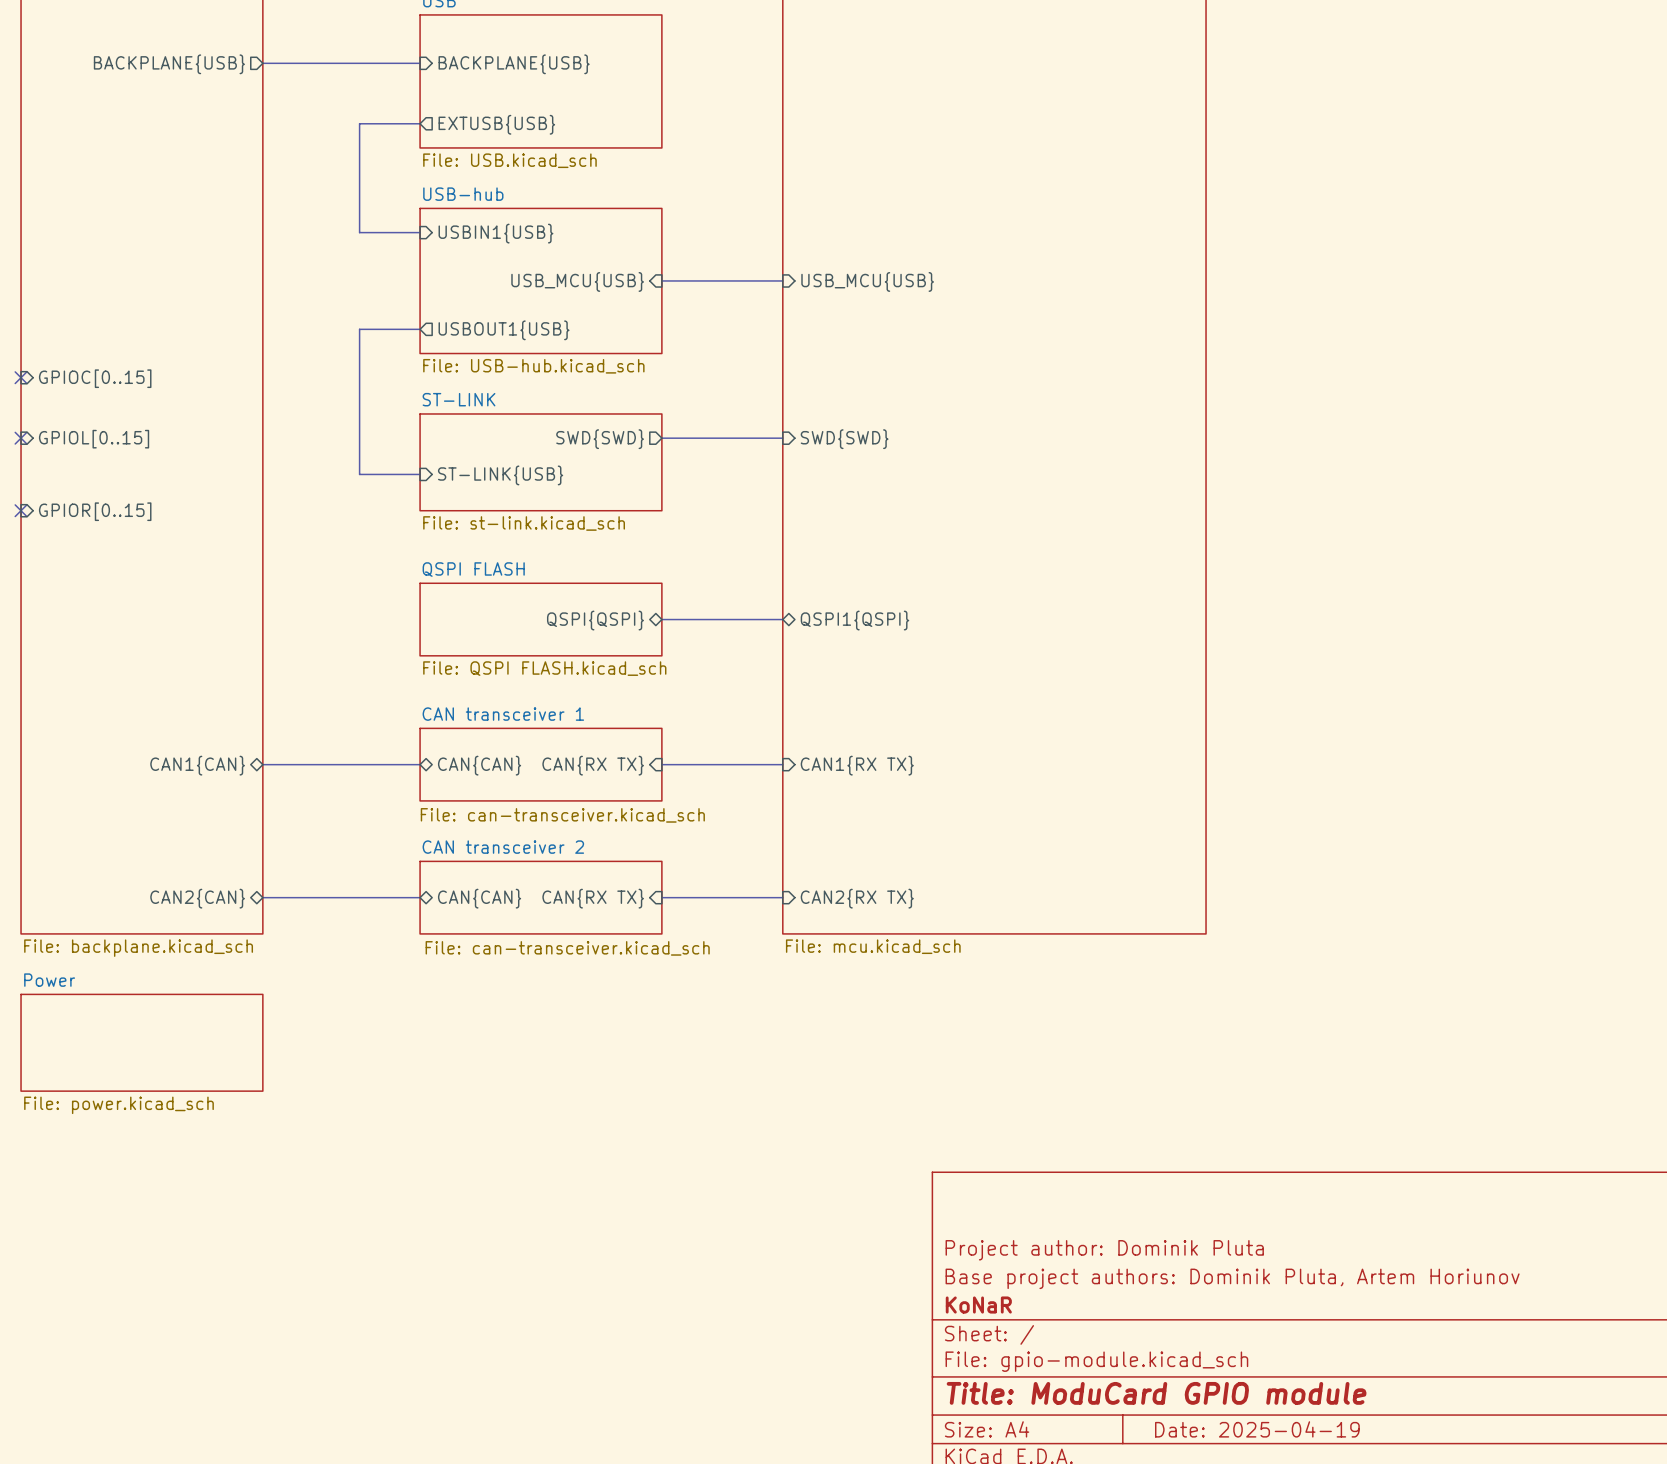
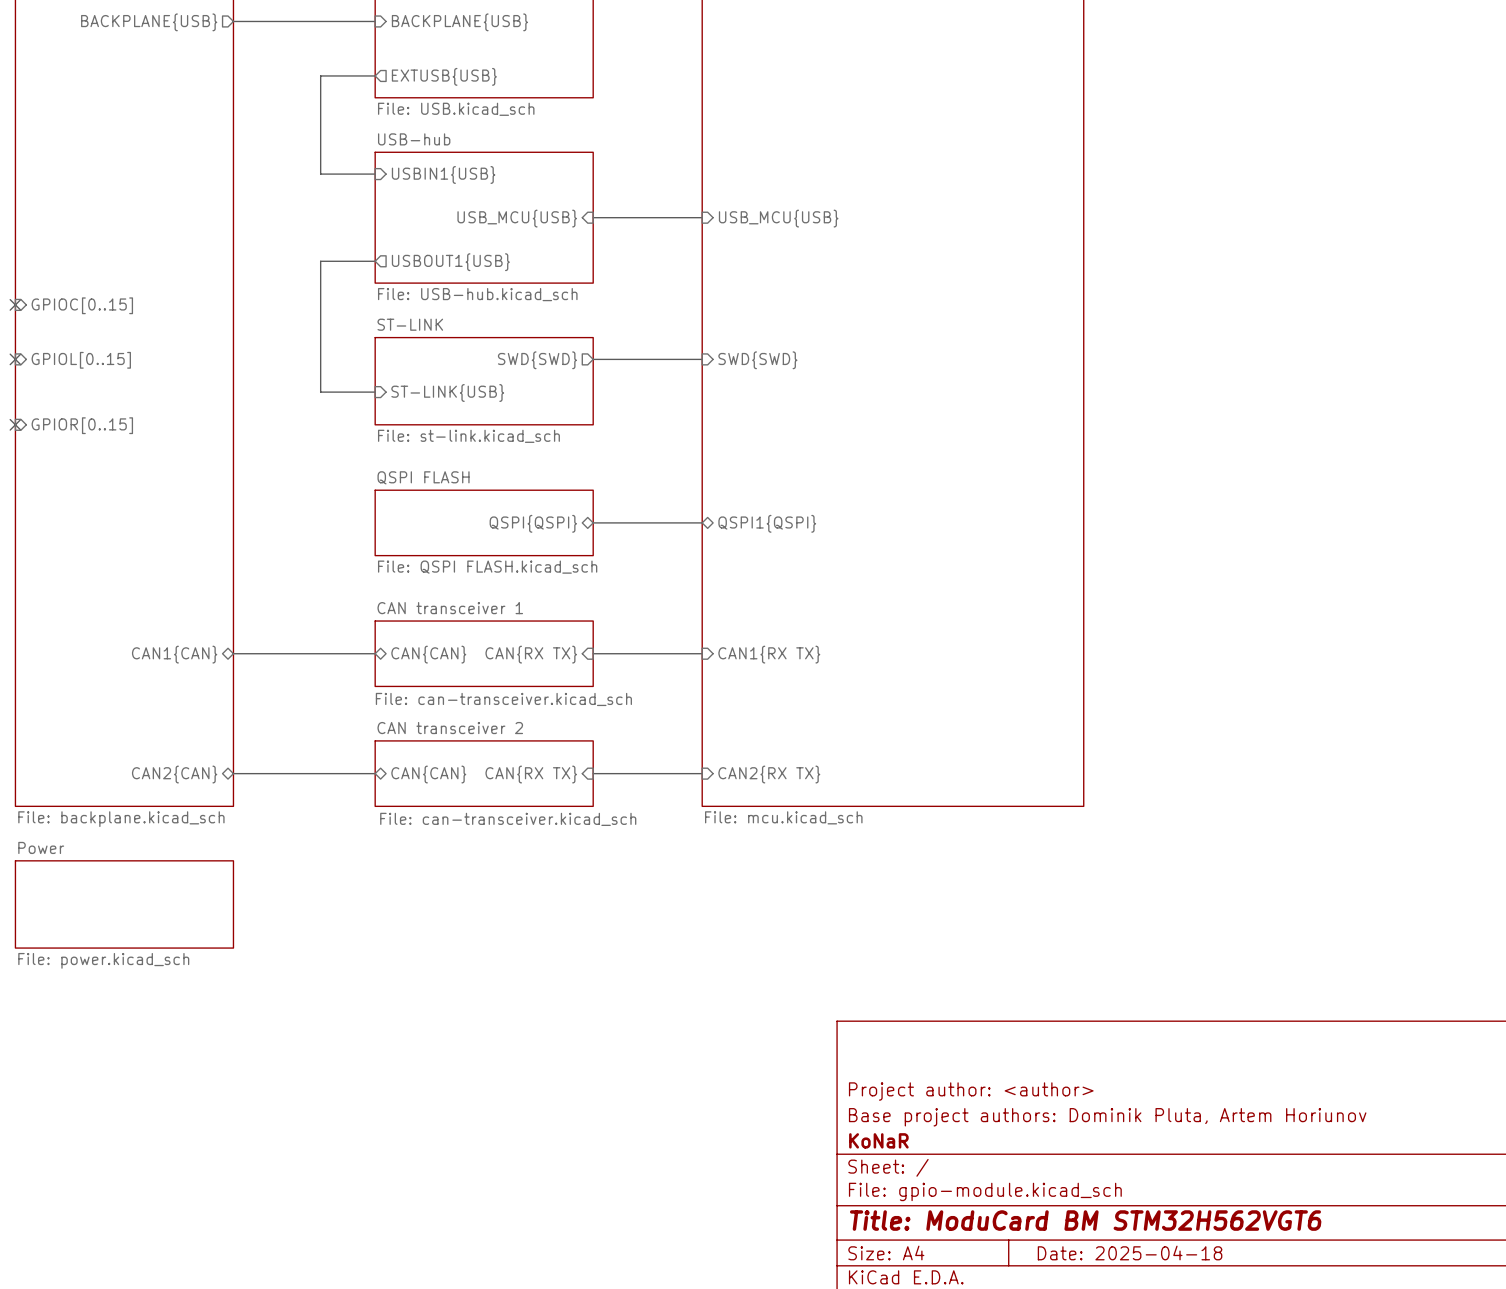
title block: Project author: Dominik Pluta (1104, 1250) -> Project author: <author> (971, 1091)
title block: Title: ModuCard GPIO module (1156, 1393) -> Title: ModuCard BM STM32H562VGT6 (1085, 1220)
title block: Date: 2025-04-19 (1257, 1429) -> Date: 2025-04-18 (1130, 1253)

